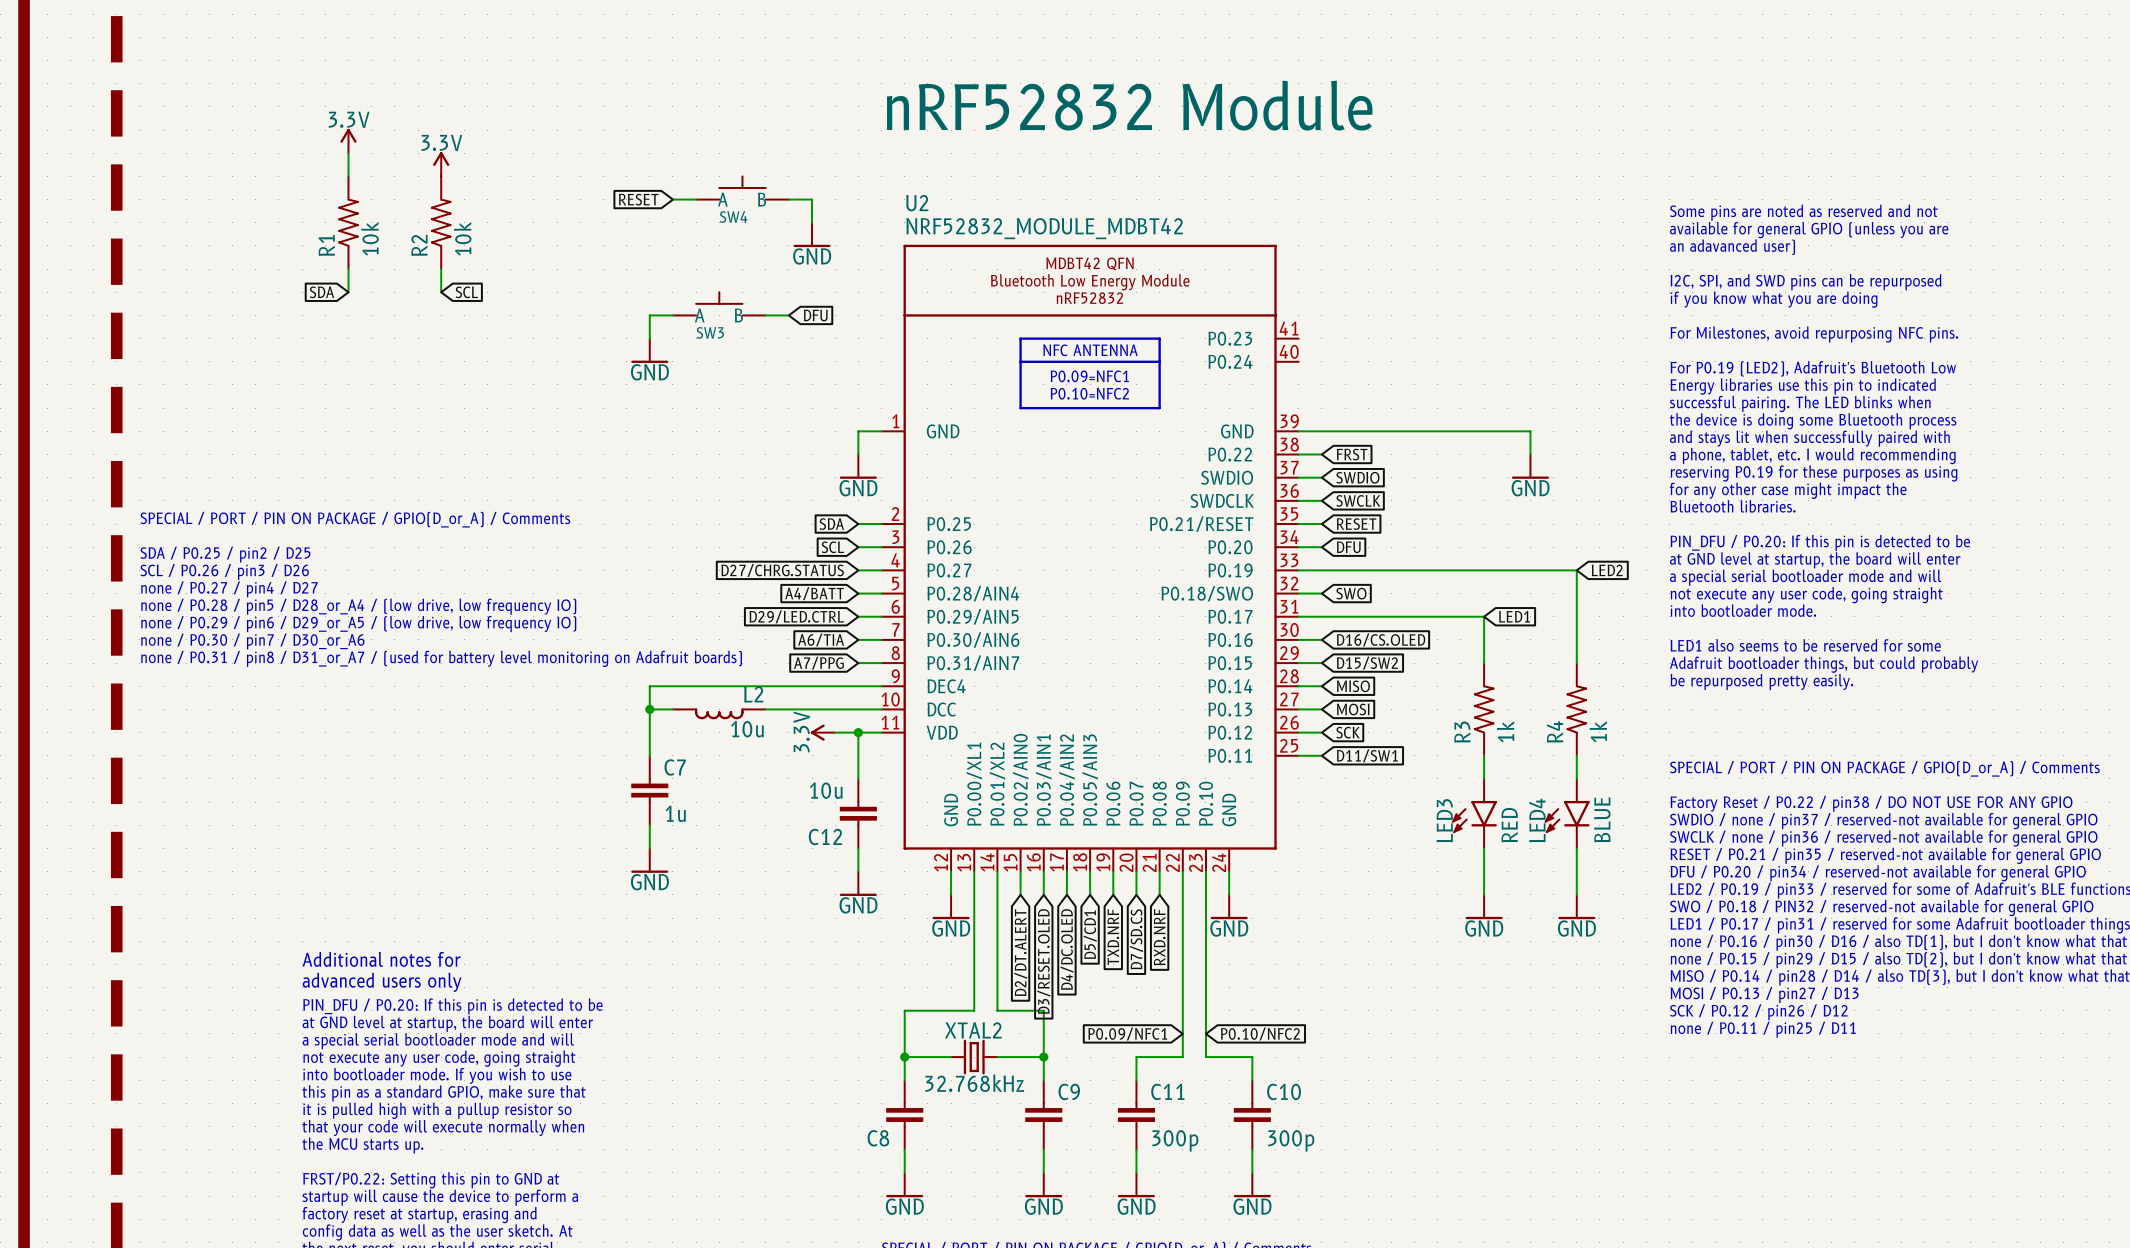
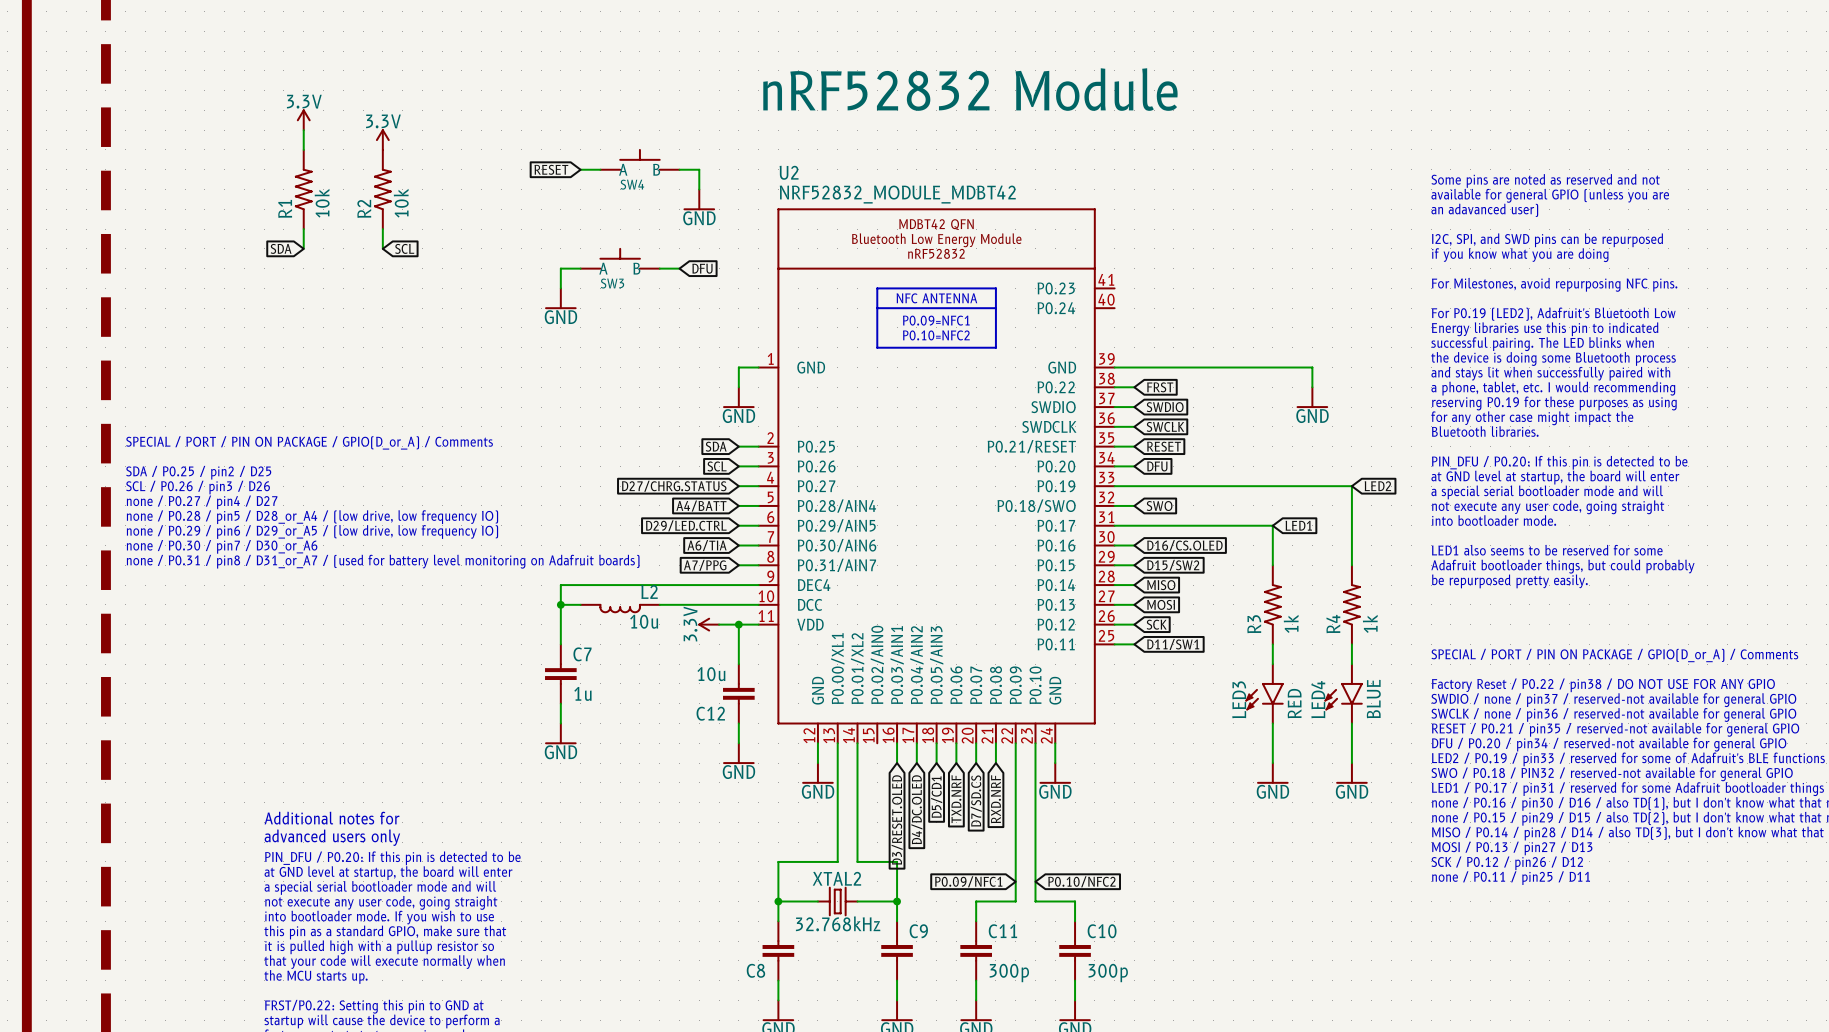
wire: (1020, 871) (1020, 894) -> none
global label: D2/DT.ALERT (1020, 952) -> none

